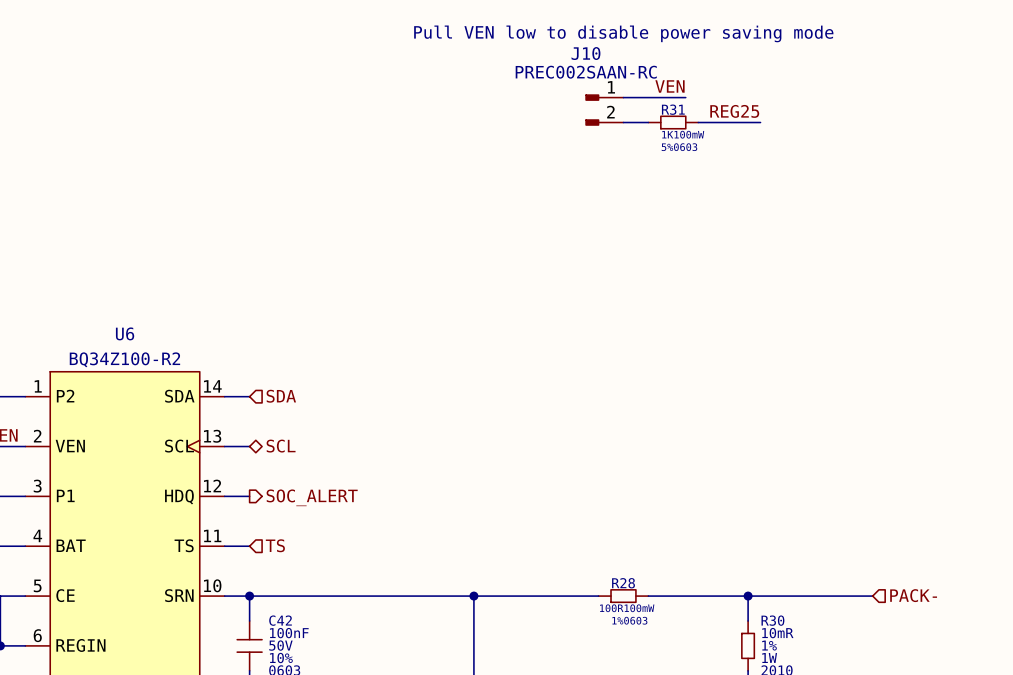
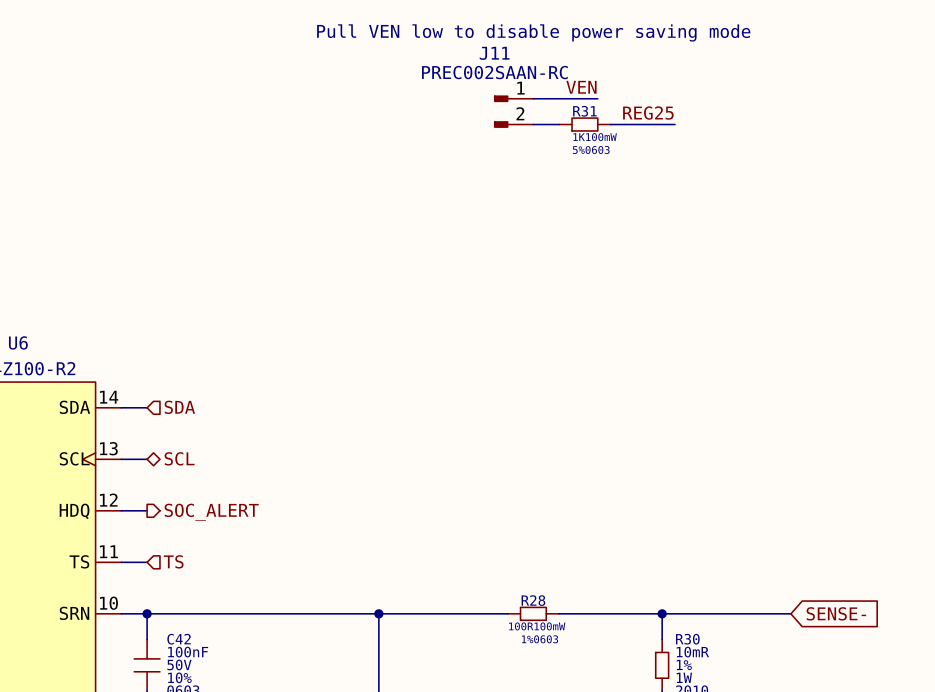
J10 name: J10 (585, 53) -> J11 (494, 53)
hierarchical label: PACK- (913, 595) -> none
global label: none -> SENSE- (836, 613)

